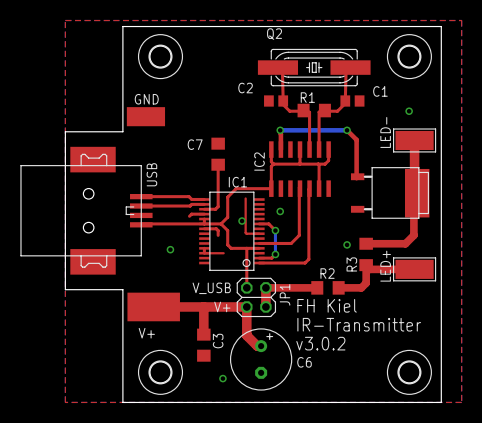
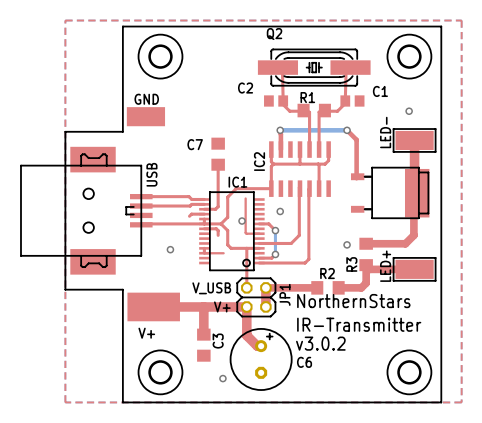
text: FH Kiel (327, 305) -> NorthernStars (353, 301)

